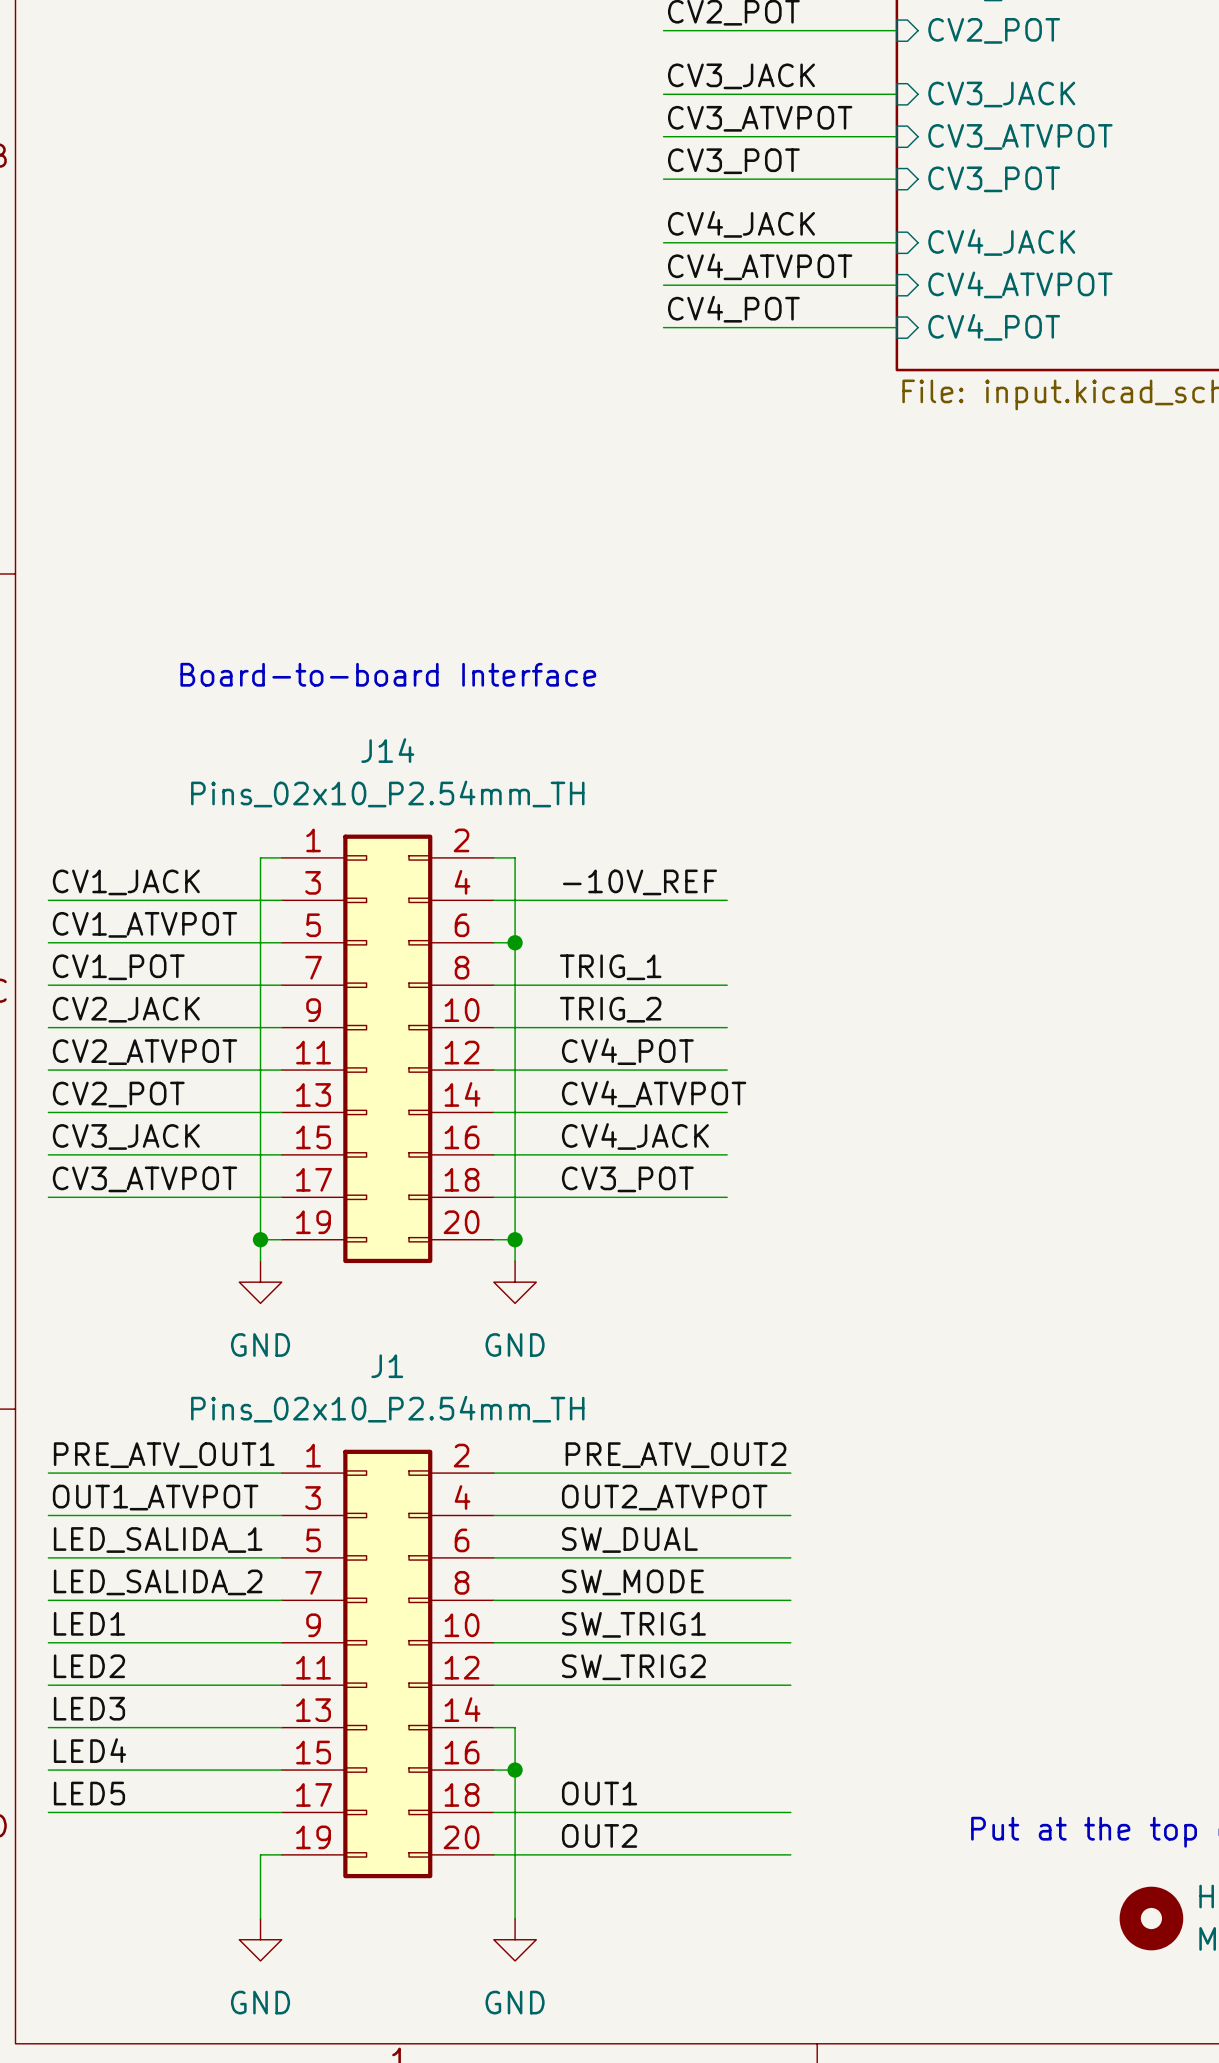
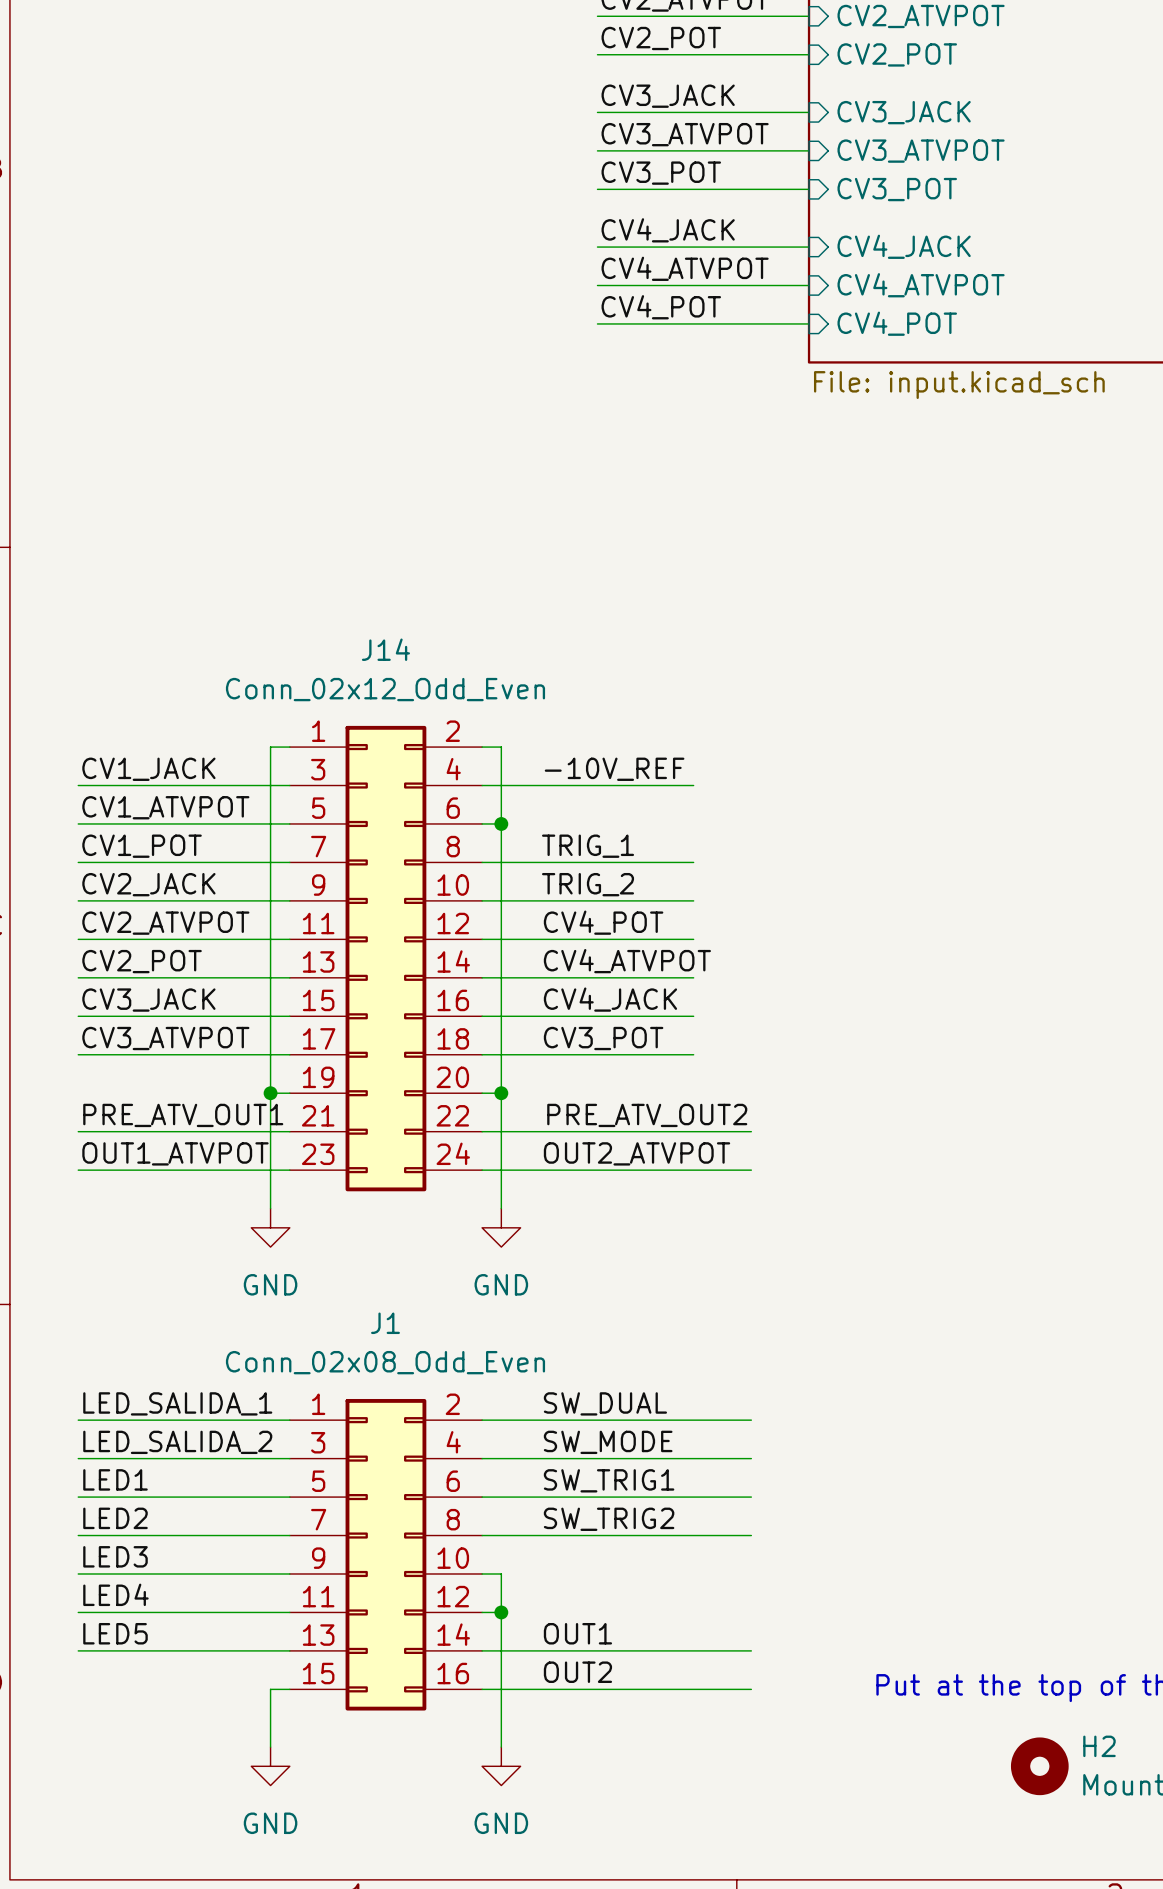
text: Board-to-board Interface (388, 674) -> none
J14 name position: J14 (387, 750) -> J14 (385, 649)
J14 value: Pins_02x10_P2.54mm_TH (387, 793) -> Conn_02x12_Odd_Even (385, 689)
wire: none -> (289, 747) (270, 747) (270, 1208)
wire: none -> (482, 747) (501, 747) (501, 1208)
J14 symbol: [281, 834, 494, 1264] -> [289, 725, 483, 1192]
wire: none -> (78, 785) (289, 785)
wire: (281, 857) (260, 857) (260, 1260) -> none
wire: (493, 857) (515, 857) (515, 1260) -> none
label position: CV1_JACK (126, 882) -> CV1_JACK (148, 769)
label position: -10V_REF (639, 882) -> -10V_REF (614, 769)
wire: (48, 900) (281, 900) -> (78, 823) (289, 823)
wire: (493, 900) (727, 900) -> (482, 785) (693, 785)
label position: CV1_ATVPOT (145, 924) -> CV1_ATVPOT (165, 807)
wire: (48, 942) (281, 942) -> (78, 862) (289, 862)
wire: (493, 942) (515, 942) -> (482, 823) (501, 823)
junction position: (515, 942) -> (501, 823)
label position: CV1_POT (118, 967) -> CV1_POT (142, 846)
label position: TRIG_1 (610, 967) -> TRIG_1 (588, 846)
wire: (48, 985) (281, 985) -> (78, 900) (289, 900)
wire: (493, 985) (727, 985) -> (482, 900) (693, 900)
label position: CV2_JACK (126, 1009) -> CV2_JACK (148, 884)
label position: TRIG_2 (610, 1009) -> TRIG_2 (588, 884)
wire: (48, 1027) (281, 1027) -> (78, 939) (289, 939)
wire: (493, 1027) (727, 1027) -> (482, 939) (693, 939)
label position: CV4_POT (627, 1051) -> CV4_POT (603, 922)
label position: CV2_ATVPOT (145, 1052) -> CV2_ATVPOT (165, 923)
wire: (48, 1070) (281, 1070) -> (78, 977) (289, 977)
wire: (493, 1070) (727, 1070) -> (482, 977) (693, 977)
label position: CV2_POT (118, 1094) -> CV2_POT (142, 961)
label position: CV4_ATVPOT (654, 1094) -> CV4_ATVPOT (627, 961)
wire: (48, 1112) (281, 1112) -> (78, 1016) (289, 1016)
wire: (493, 1112) (727, 1112) -> (482, 1016) (693, 1016)
label position: CV3_JACK (126, 1136) -> CV3_JACK (148, 1000)
label position: CV4_JACK (635, 1136) -> CV4_JACK (610, 999)
wire: (48, 1154) (281, 1154) -> (78, 1054) (289, 1054)
wire: (493, 1154) (727, 1154) -> (482, 1054) (693, 1054)
label position: CV3_ATVPOT (145, 1179) -> CV3_ATVPOT (165, 1038)
label position: CV3_POT (627, 1179) -> CV3_POT (603, 1038)
wire: (48, 1197) (281, 1197) -> (78, 1131) (289, 1131)
wire: (493, 1197) (727, 1197) -> (482, 862) (693, 862)
wire: (260, 1239) (281, 1239) -> (270, 1093) (289, 1093)
junction position: (260, 1239) -> (270, 1093)
wire: (493, 1239) (515, 1239) -> (482, 1093) (501, 1093)
junction position: (515, 1239) -> (501, 1093)
power symbol position: GND (260, 1282) -> GND (270, 1227)
power symbol position: GND (515, 1282) -> GND (501, 1227)
J1 name position: J1 (387, 1366) -> J1 (385, 1323)
J1 value: Pins_02x10_P2.54mm_TH (387, 1409) -> Conn_02x08_Odd_Even (385, 1362)
J1 symbol: [281, 1449, 494, 1879] -> [289, 1398, 483, 1711]
label position: PRE_ATV_OUT1 (164, 1455) -> PRE_ATV_OUT1 (183, 1115)
label position: PRE_ATV_OUT2 (676, 1455) -> PRE_ATV_OUT2 (647, 1115)
wire: (48, 1473) (281, 1473) -> none
wire: (493, 1473) (790, 1473) -> (482, 1131) (751, 1131)
label position: OUT1_ATVPOT (155, 1497) -> OUT1_ATVPOT (175, 1153)
label position: OUT2_ATVPOT (664, 1497) -> OUT2_ATVPOT (637, 1153)
wire: (48, 1515) (281, 1515) -> (78, 1170) (289, 1170)
wire: (493, 1515) (790, 1515) -> (482, 1170) (751, 1170)
label position: LED_SALIDA_1 (158, 1540) -> LED_SALIDA_1 (177, 1403)
label position: SW_DUAL (629, 1540) -> SW_DUAL (605, 1403)
wire: (48, 1557) (281, 1557) -> (78, 1420) (289, 1420)
wire: (493, 1557) (790, 1557) -> (482, 1420) (751, 1420)
label position: LED_SALIDA_2 (158, 1582) -> LED_SALIDA_2 (177, 1442)
label position: SW_MODE (632, 1582) -> SW_MODE (608, 1442)
wire: (48, 1600) (281, 1600) -> (78, 1458) (289, 1458)
wire: (493, 1600) (790, 1600) -> (482, 1458) (751, 1458)
label position: LED1 (89, 1623) -> LED1 (115, 1479)
label position: SW_TRIG1 (633, 1624) -> SW_TRIG1 (609, 1480)
wire: (48, 1642) (281, 1642) -> (78, 1497) (289, 1497)
wire: (493, 1642) (790, 1642) -> (482, 1497) (751, 1497)
label position: LED2 (89, 1666) -> LED2 (115, 1518)
label position: SW_TRIG2 (633, 1667) -> SW_TRIG2 (609, 1519)
wire: (48, 1685) (281, 1685) -> (78, 1535) (289, 1535)
wire: (493, 1685) (790, 1685) -> (482, 1535) (751, 1535)
label position: LED3 (89, 1708) -> LED3 (115, 1556)
wire: (48, 1727) (281, 1727) -> (78, 1573) (289, 1573)
wire: (493, 1727) (515, 1727) (515, 1918) -> (482, 1573) (501, 1573) (501, 1747)
label position: LED4 (89, 1750) -> LED4 (115, 1594)
wire: (48, 1770) (281, 1770) -> (78, 1612) (289, 1612)
wire: (493, 1770) (515, 1770) -> (482, 1612) (501, 1612)
junction position: (515, 1770) -> (501, 1612)
label position: LED5 (89, 1793) -> LED5 (115, 1633)
label position: OUT1 (599, 1793) -> OUT1 (577, 1633)
wire: (48, 1812) (281, 1812) -> (78, 1650) (289, 1650)
wire: (493, 1812) (790, 1812) -> (482, 1650) (751, 1650)
label position: OUT2 (599, 1835) -> OUT2 (577, 1672)
wire: (281, 1854) (260, 1854) (260, 1918) -> (289, 1689) (270, 1689) (270, 1747)
wire: (493, 1854) (790, 1854) -> (482, 1689) (751, 1689)
power symbol position: GND (260, 1939) -> GND (270, 1766)
power symbol position: GND (515, 1939) -> GND (501, 1766)

